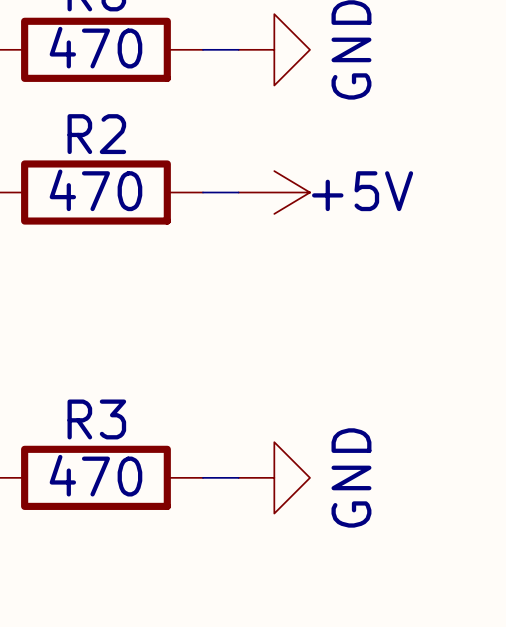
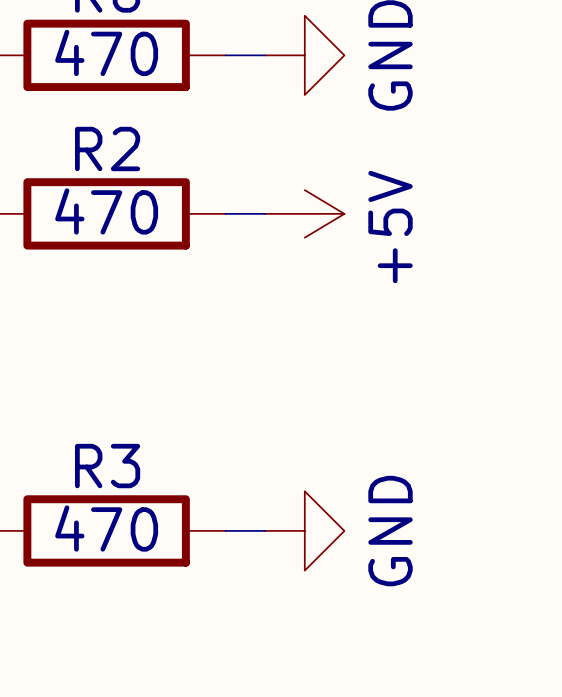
power symbol text rotation: 0° (362, 191) -> 90° counterclockwise (390, 227)

